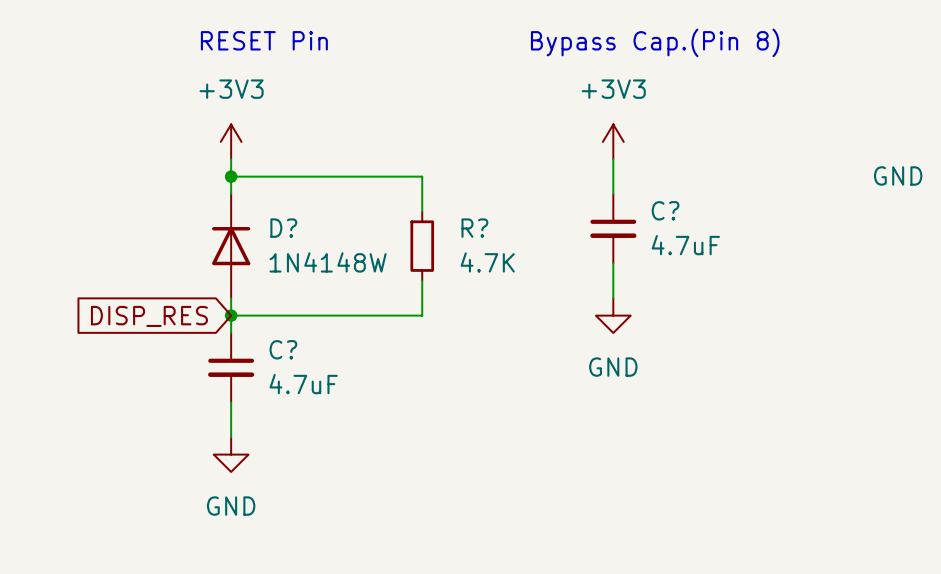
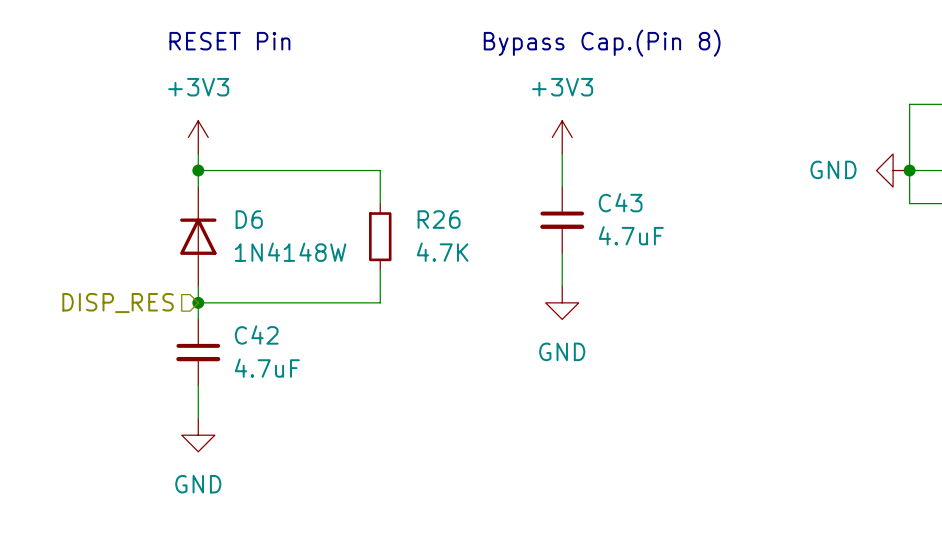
C? name: C? (665, 210) -> C43 (620, 202)
D? name: D? (283, 228) -> D6 (249, 219)
R? name: R? (474, 228) -> R26 (439, 219)
hierarchical label: none -> DISP_RES (118, 303)
global label: DISP_RES (149, 316) -> none
C? name: C? (283, 349) -> C42 (256, 335)

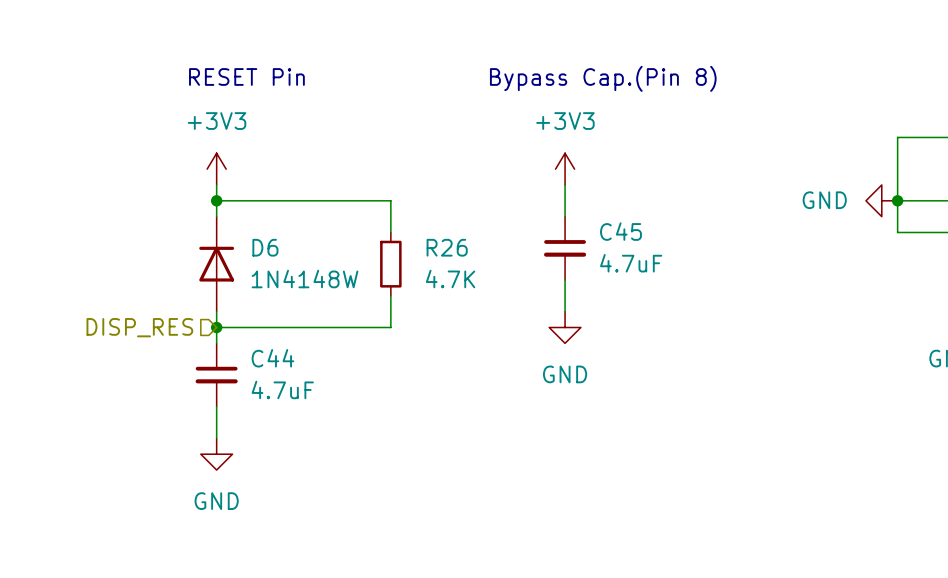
C43 name: C43 (620, 202) -> C45 (620, 231)
C42 name: C42 (256, 335) -> C44 (272, 358)

